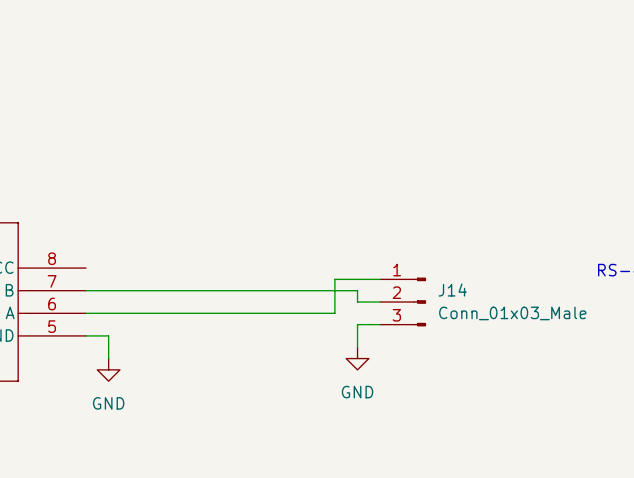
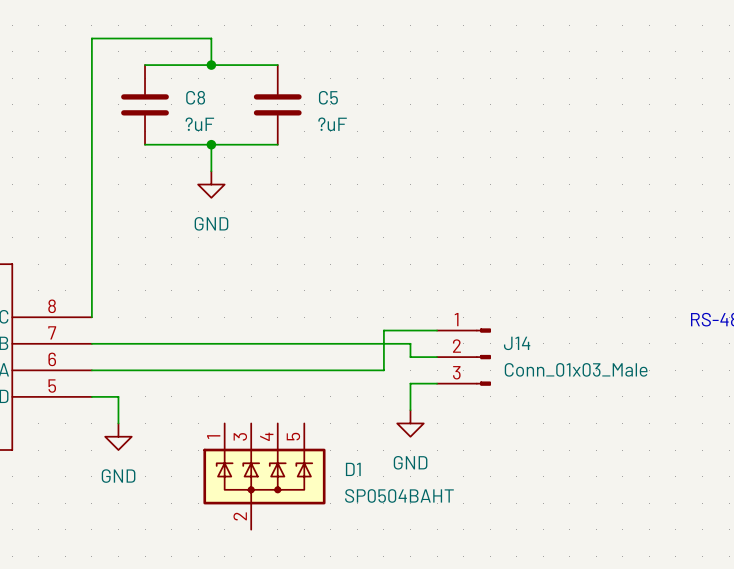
wire: none -> (145, 65) (277, 65)
wire: none -> (211, 65) (211, 38) (91, 38) (91, 317)
junction: none -> (211, 65)
C8: none -> ?uF (145, 104)
C5: none -> ?uF (277, 104)
wire: none -> (145, 144) (277, 144)
wire: none -> (211, 144) (211, 171)
junction: none -> (211, 144)
power symbol: none -> GND (211, 184)
D1: none -> SP0504BAHT (264, 476)

